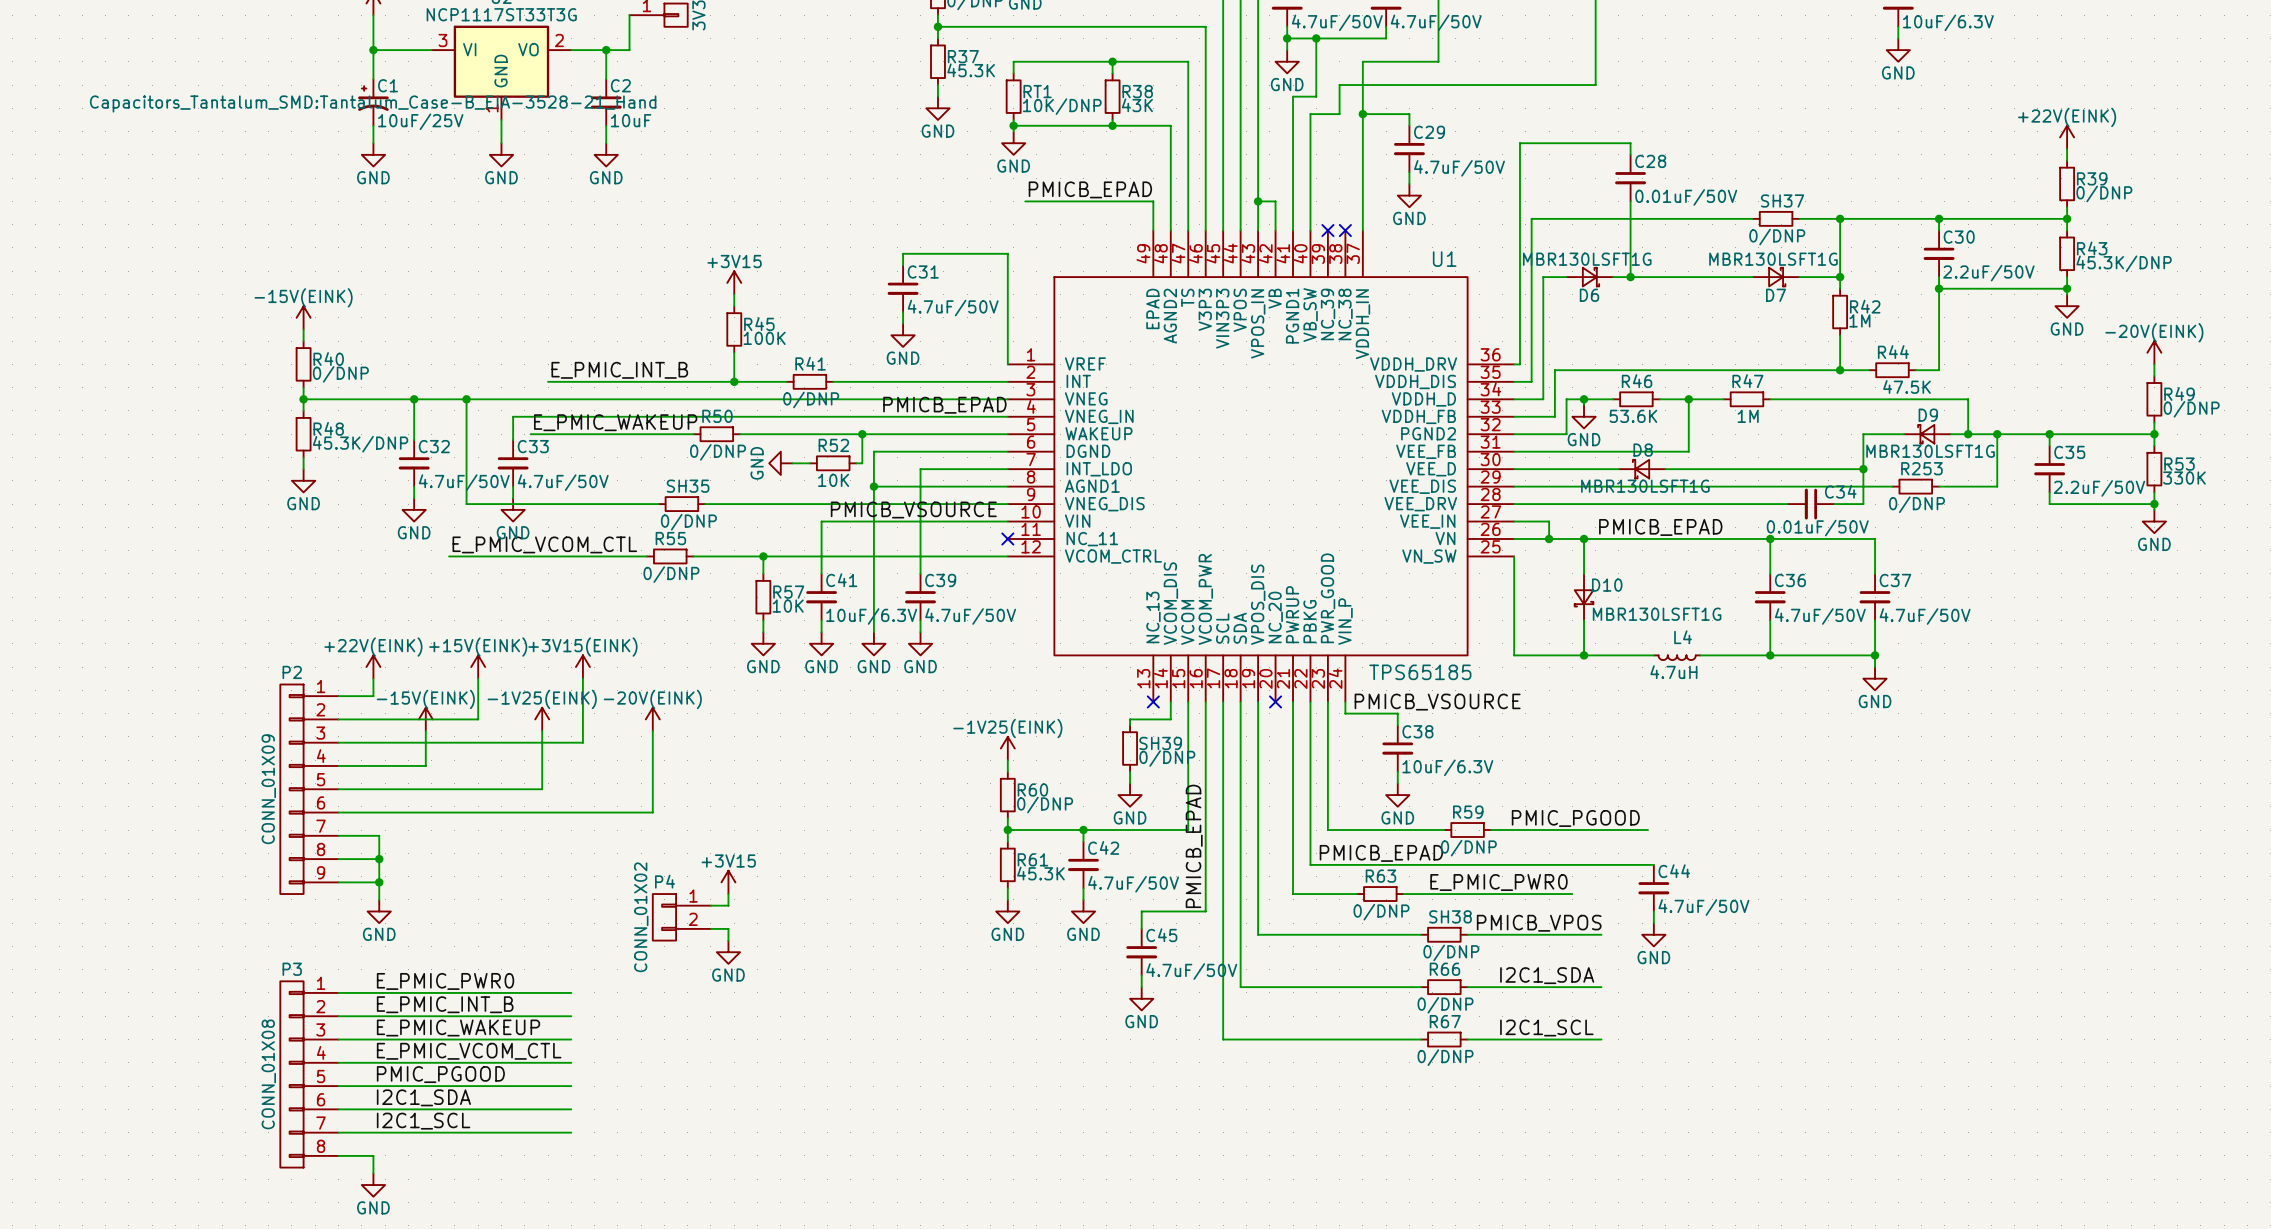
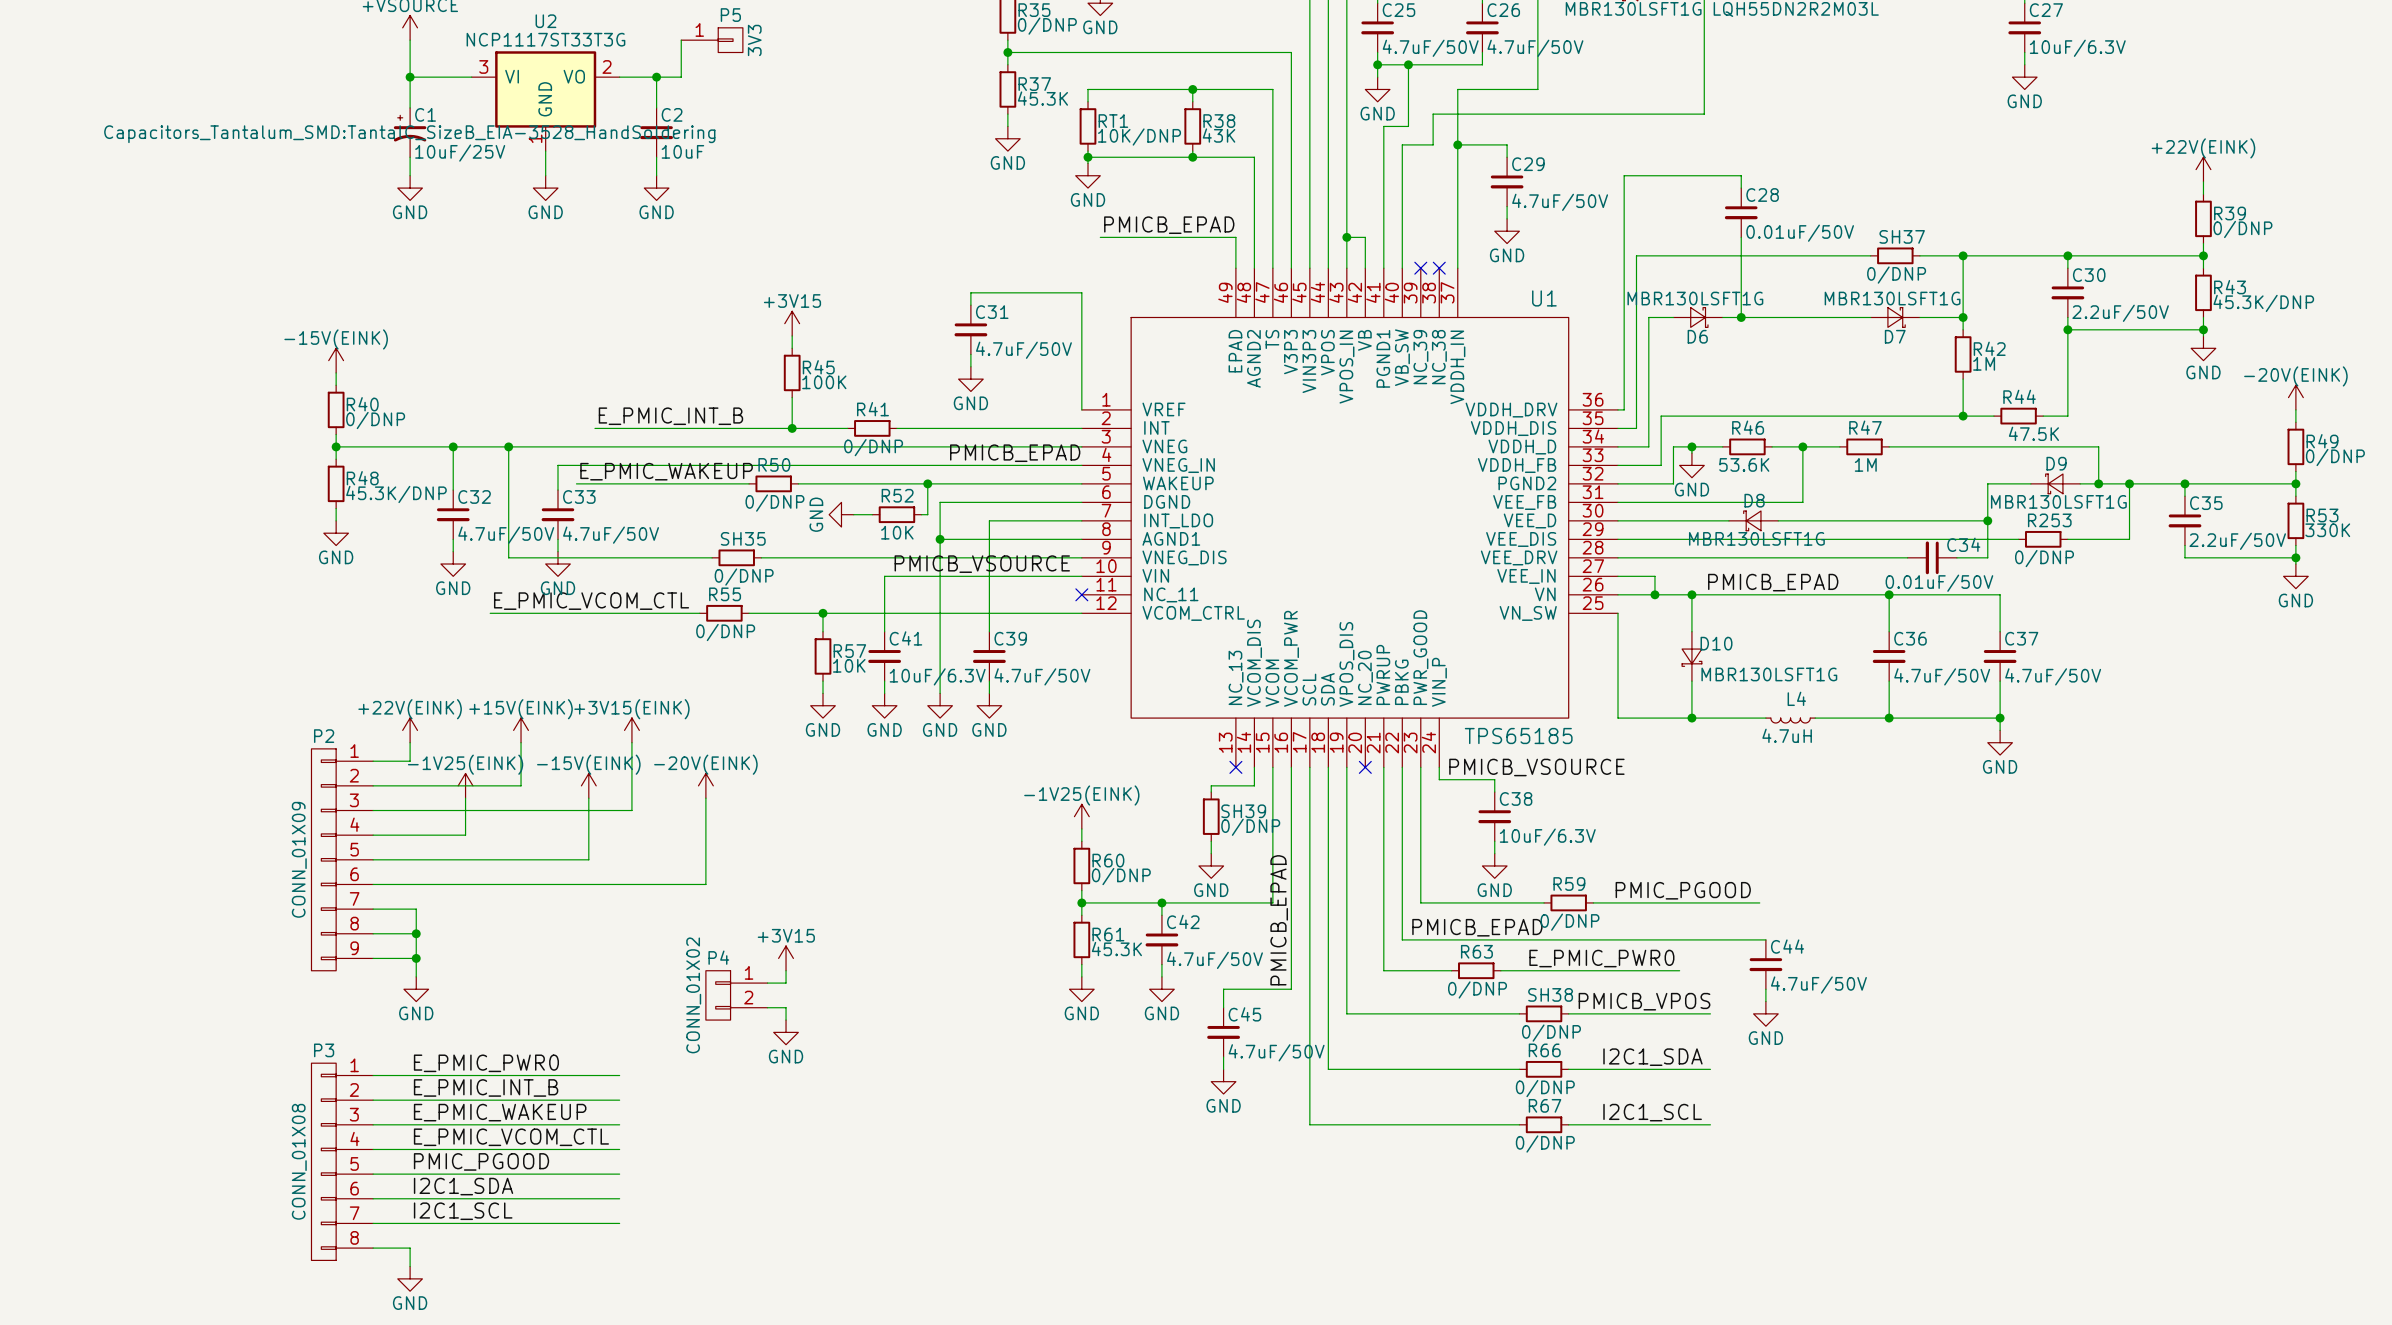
C1 text: Capacitors_Tantalum_SMD:Tantalum_Case-B_EIA-3528-21_Hand (373, 103) -> Capacitors_Tantalum_SMD:TantalC_SizeB_EIA-3528_HandSoldering (409, 134)
power symbol: -15V(EINK) (425, 719) -> -1V25(EINK) (465, 785)
power symbol: -1V25(EINK) (542, 719) -> -15V(EINK) (588, 785)

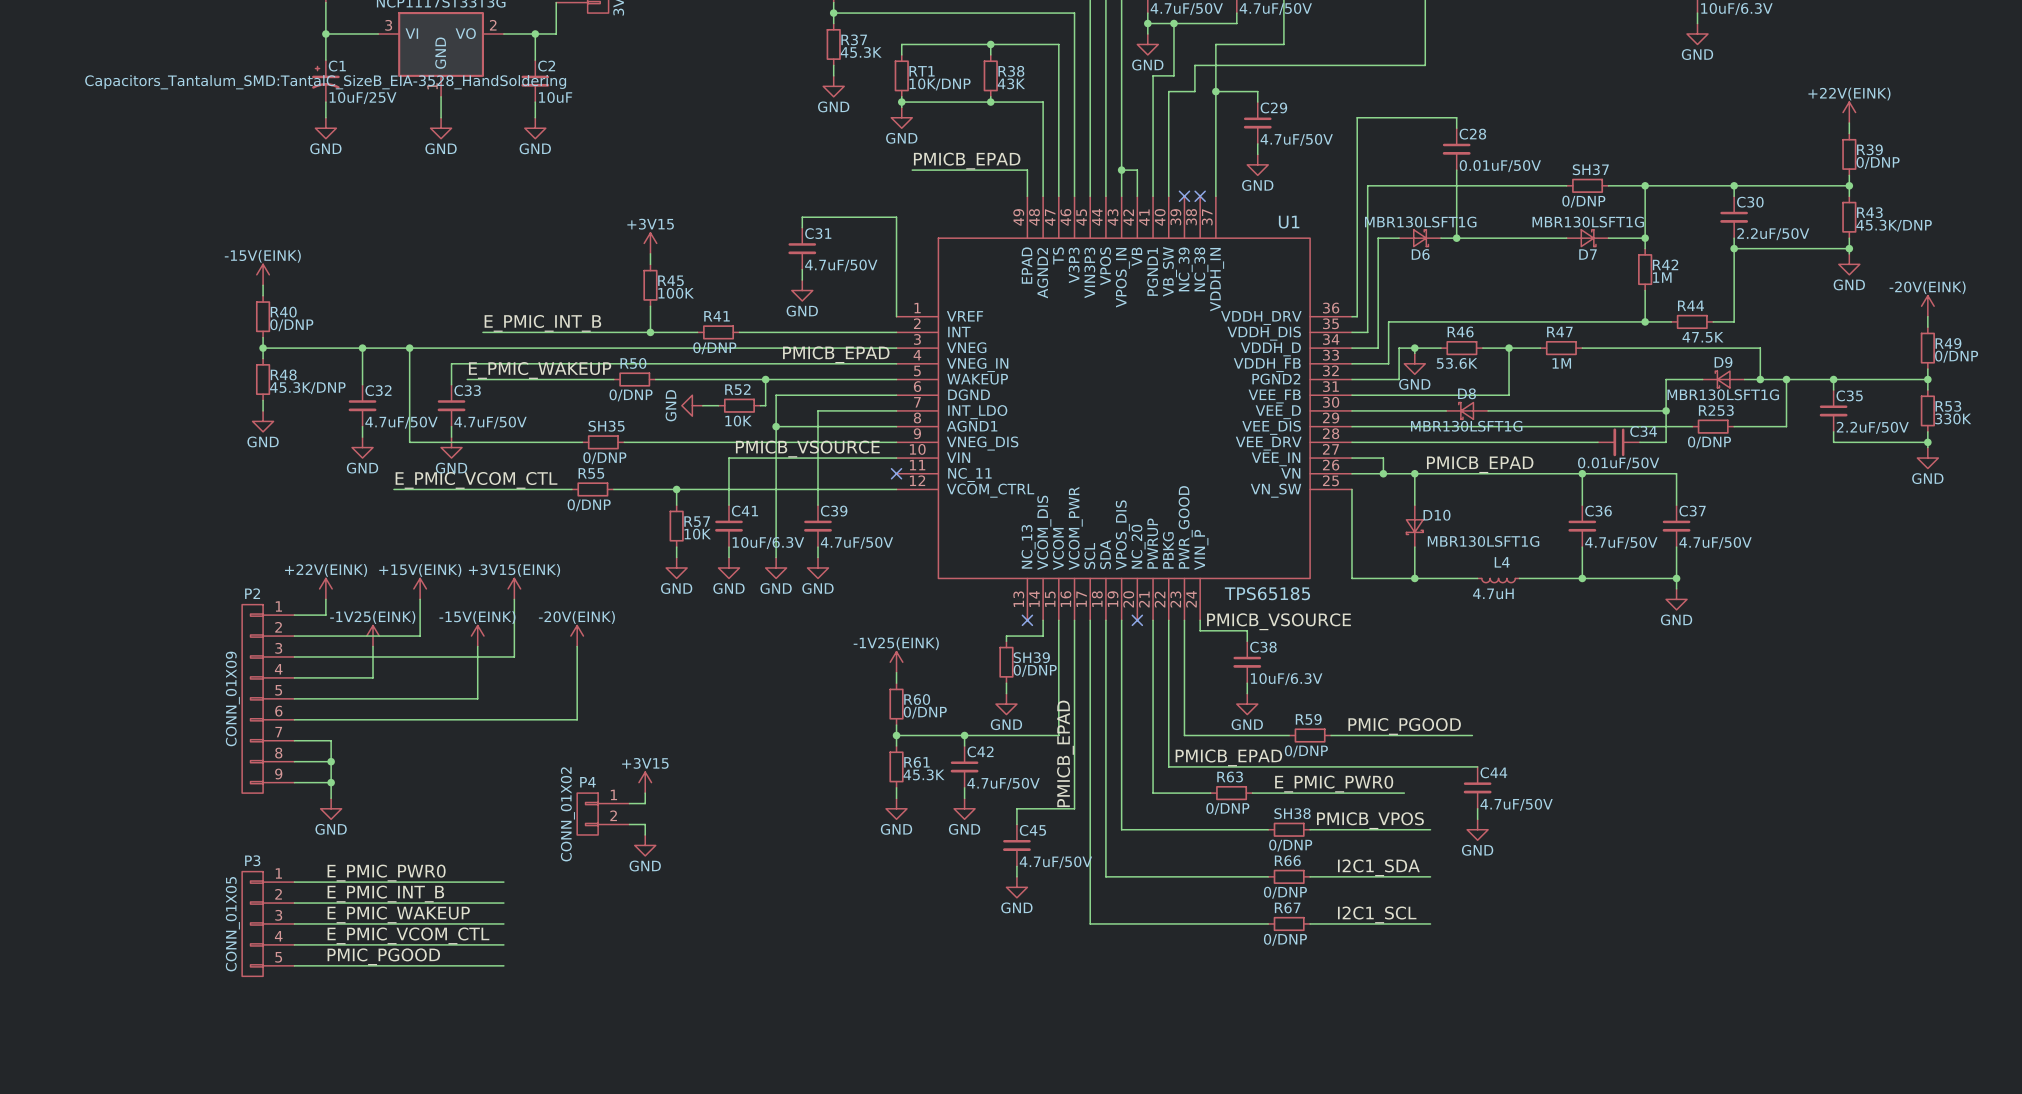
P3 symbol: [311, 1063, 374, 1261] -> [242, 871, 295, 977]
P3 value: CONN_01X08 (299, 1161) -> CONN_01X05 (232, 924)
label: I2C1_SDA (463, 1186) -> none
wire: (373, 1198) (619, 1198) -> none
label: I2C1_SCL (463, 1211) -> none
wire: (373, 1223) (619, 1223) -> none
wire: (373, 1248) (410, 1248) (410, 1266) -> none
power symbol: GND (410, 1278) -> none

